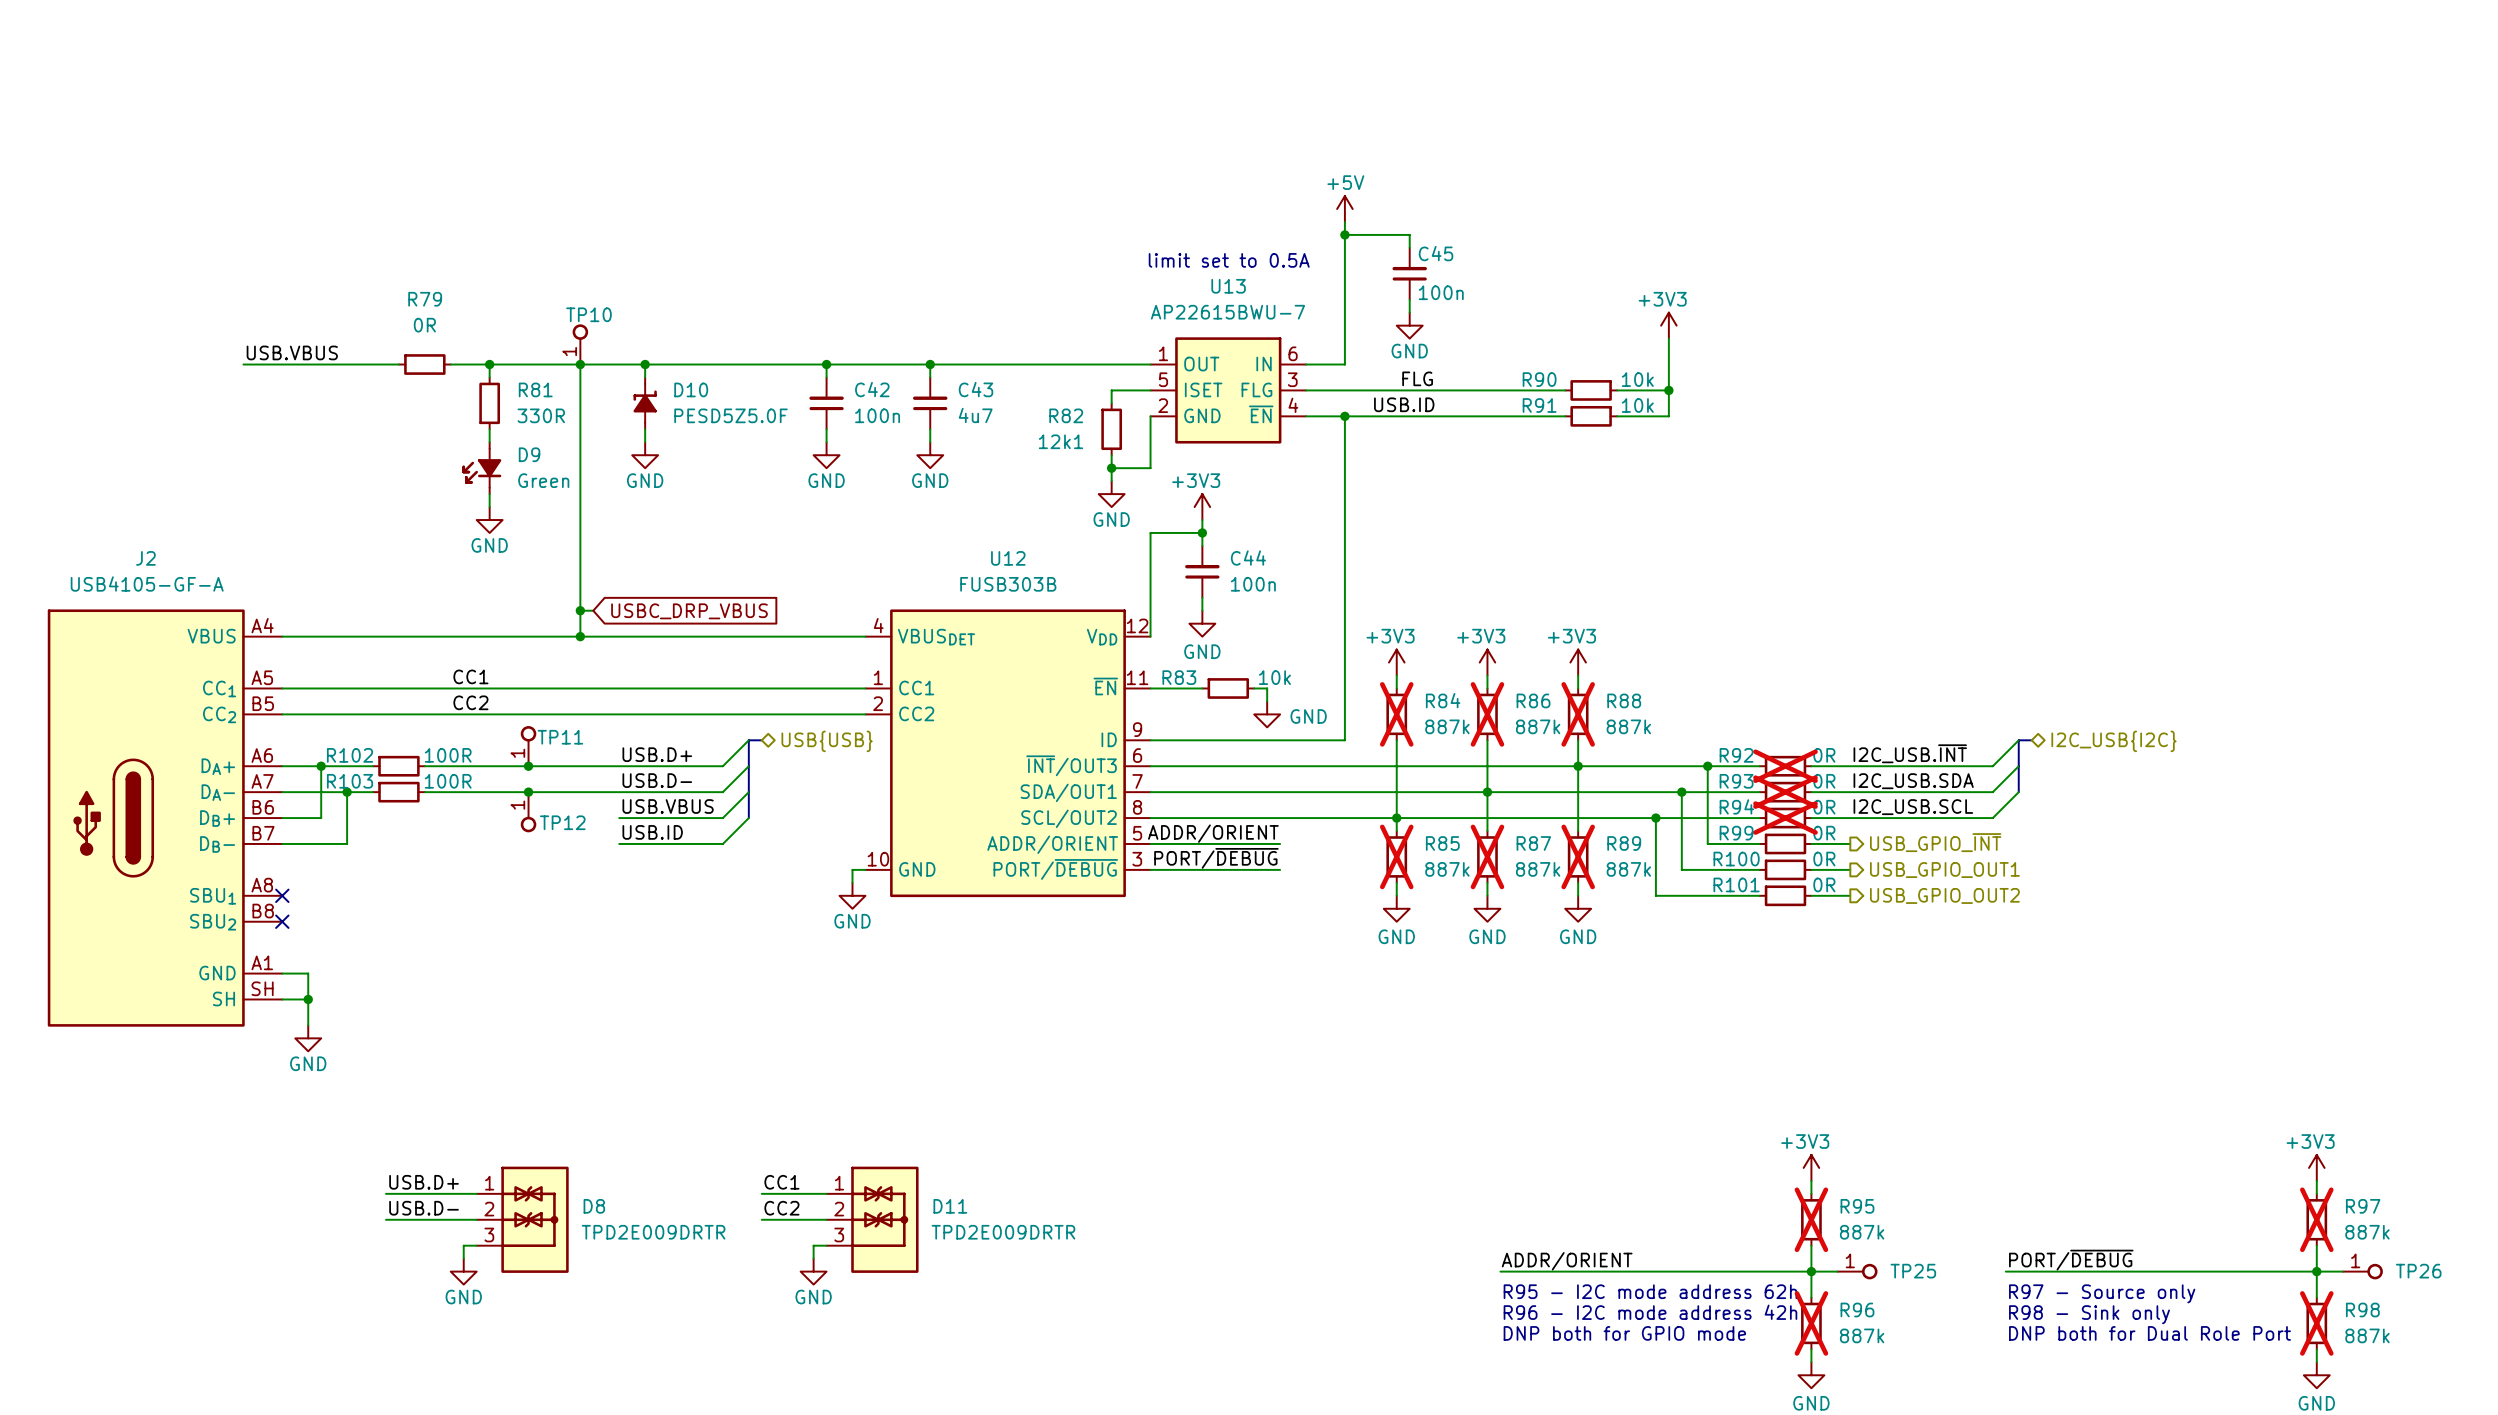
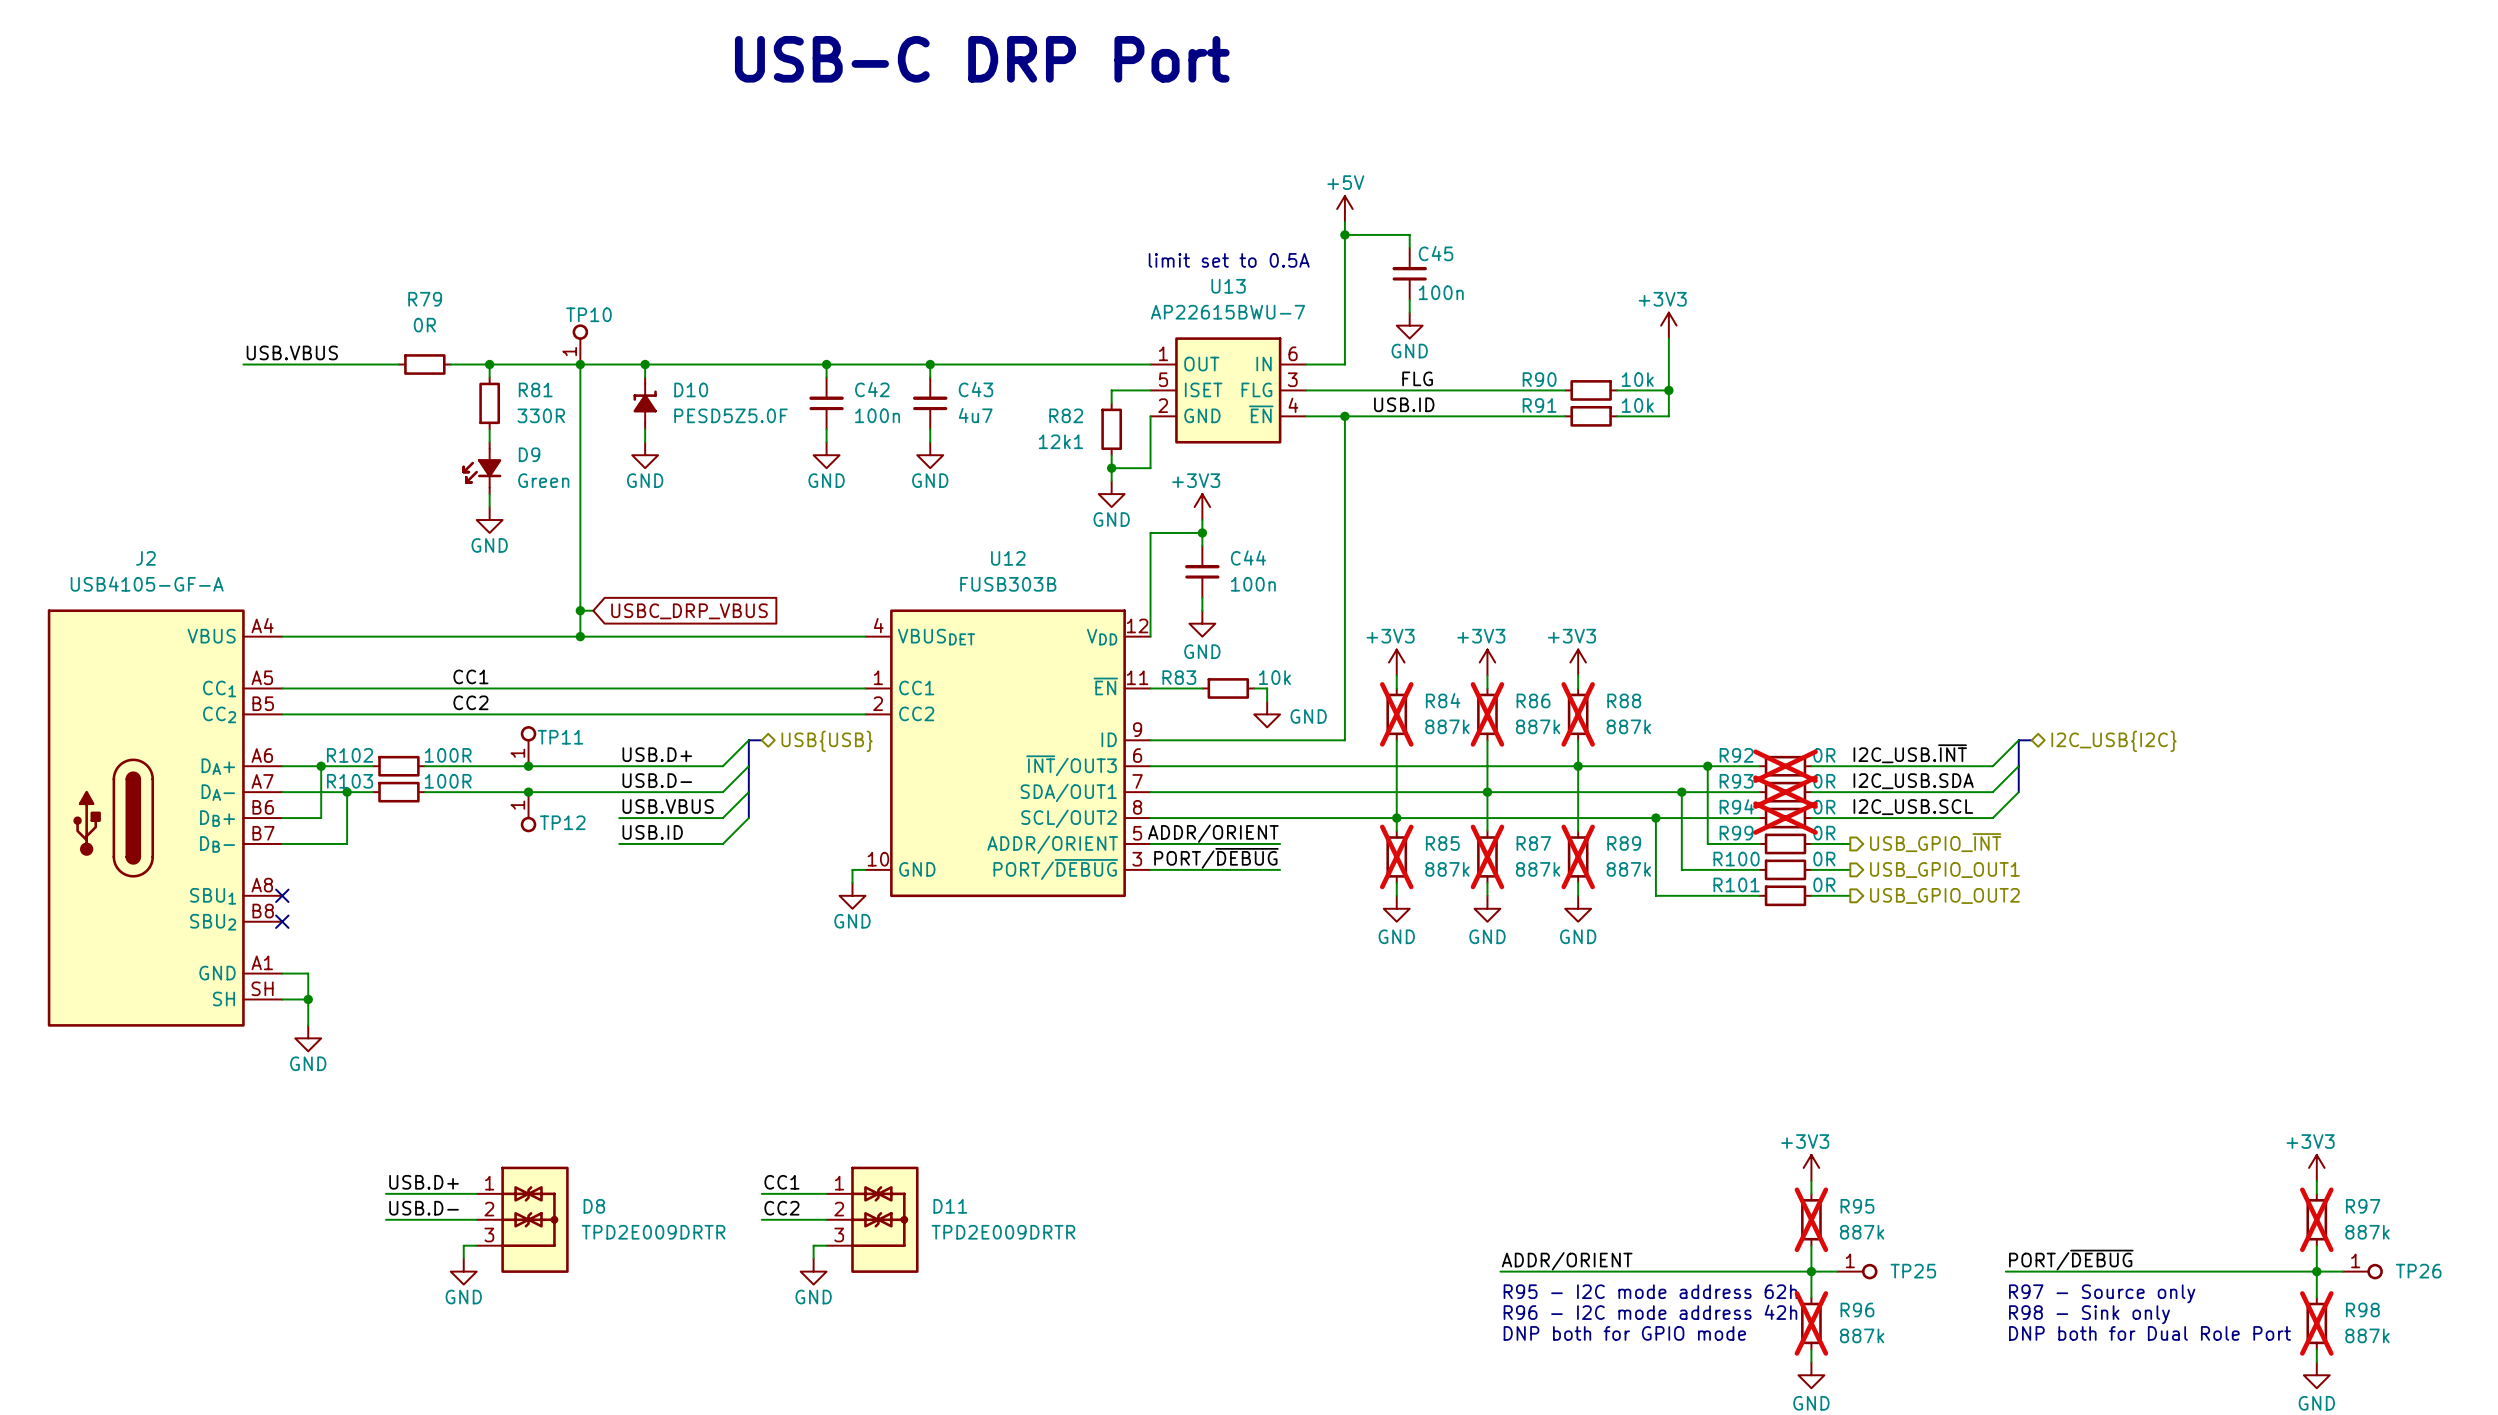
text: none -> USB-C DRP Port (982, 59)

